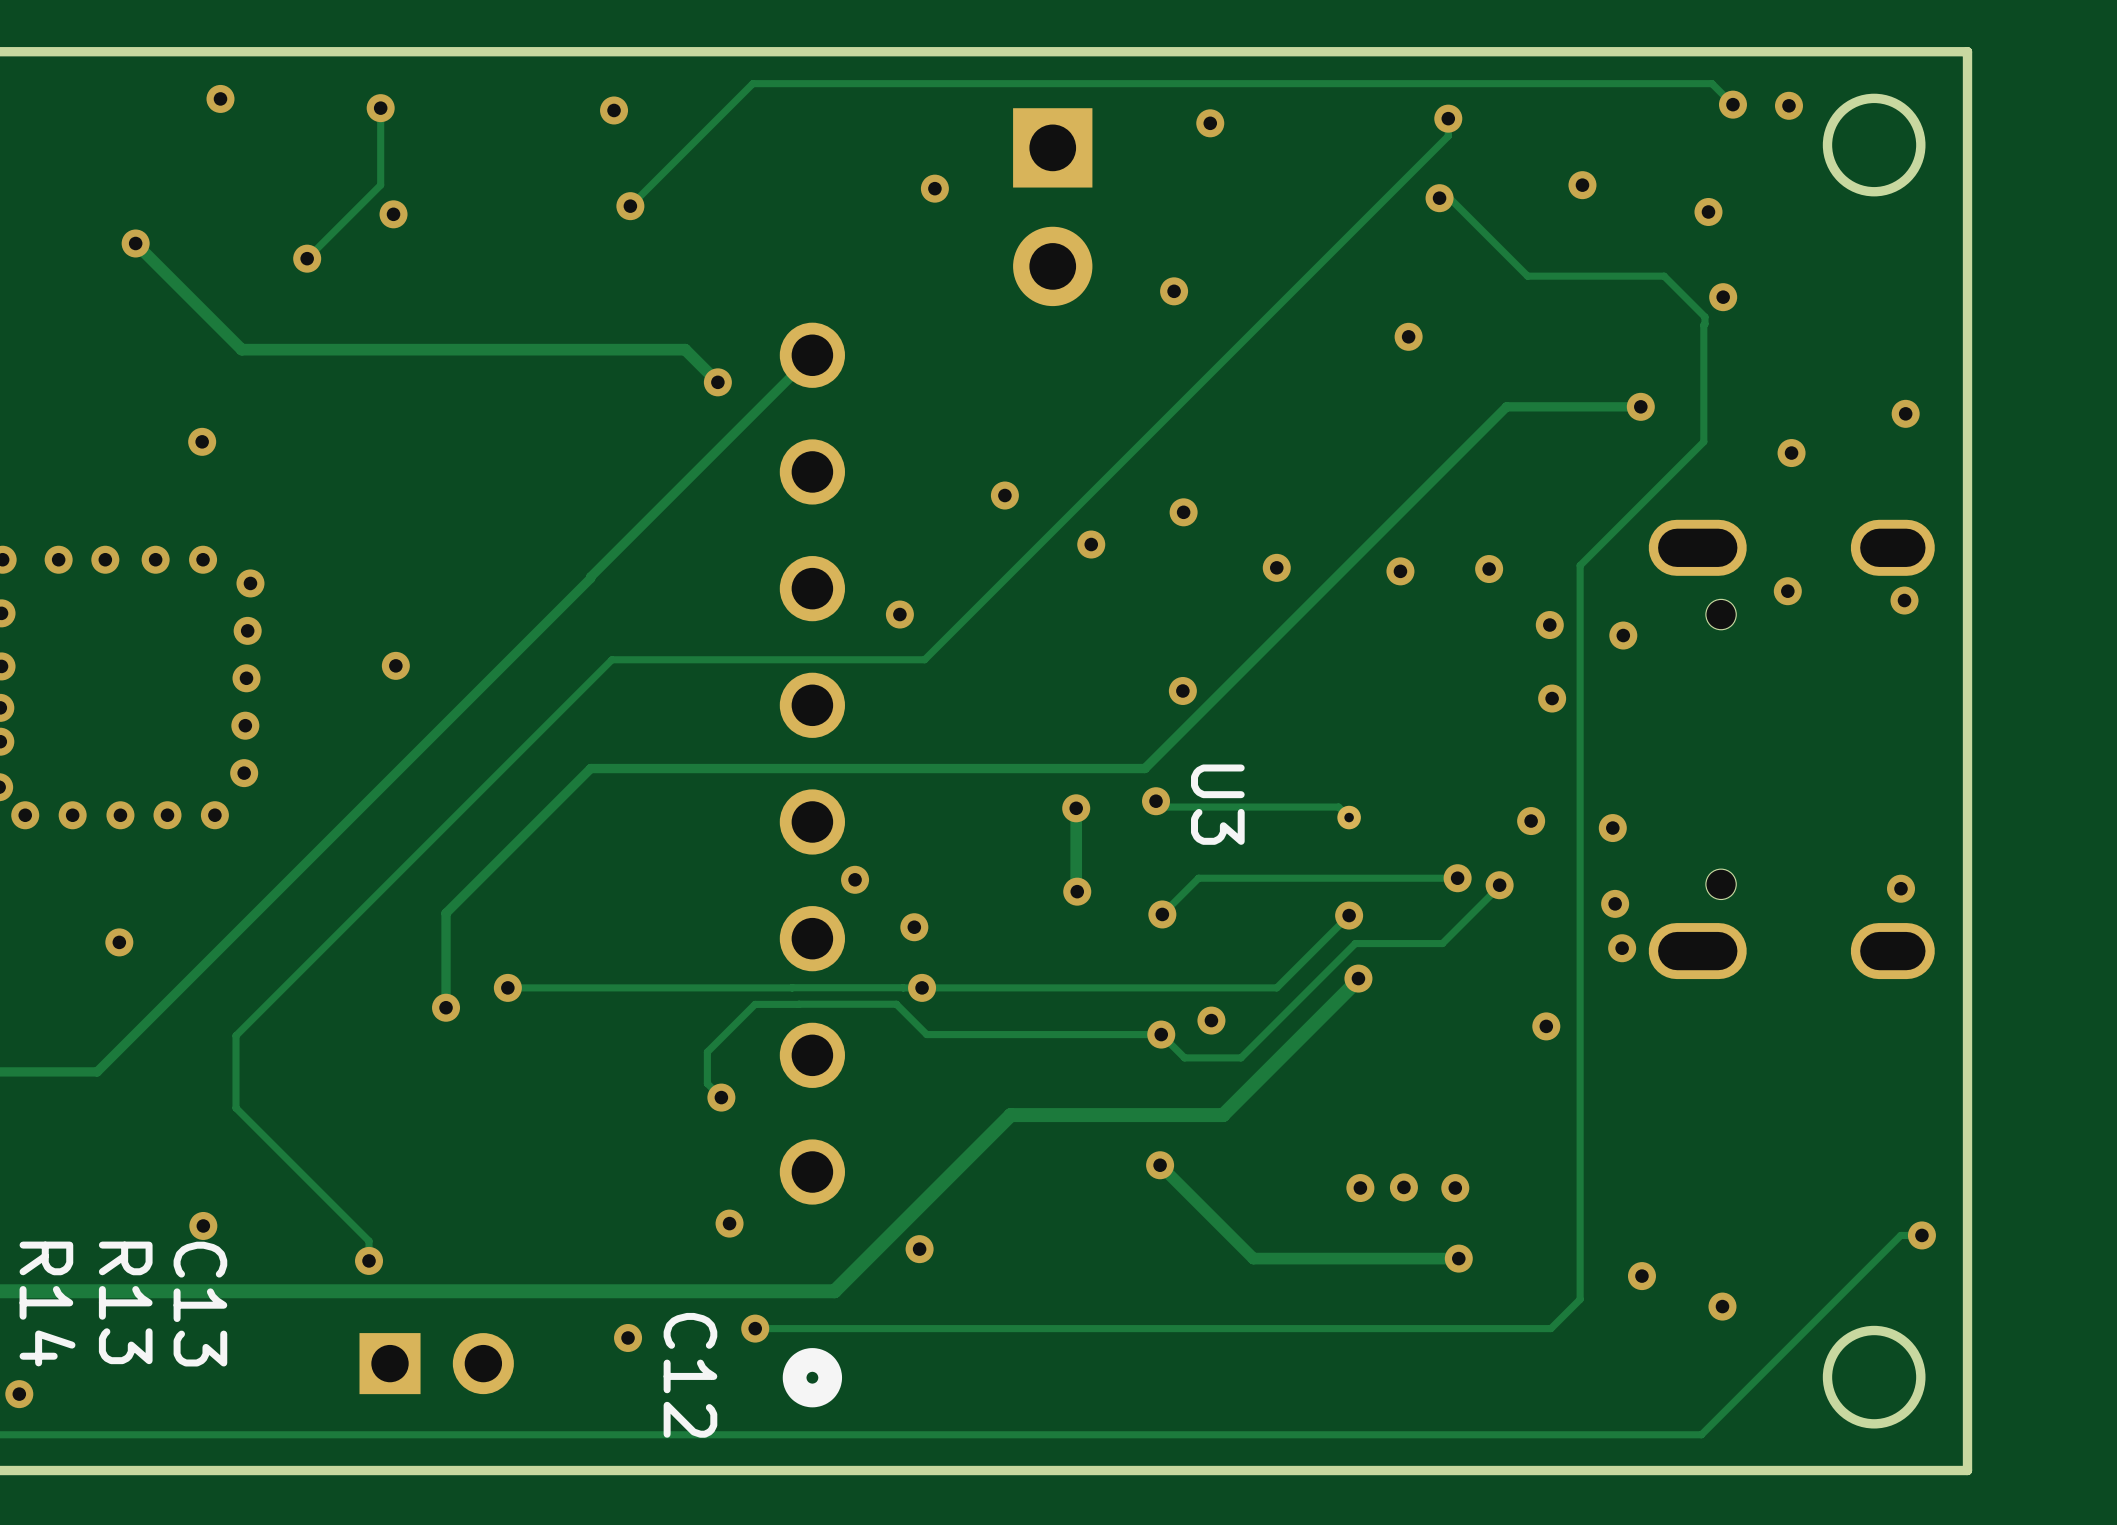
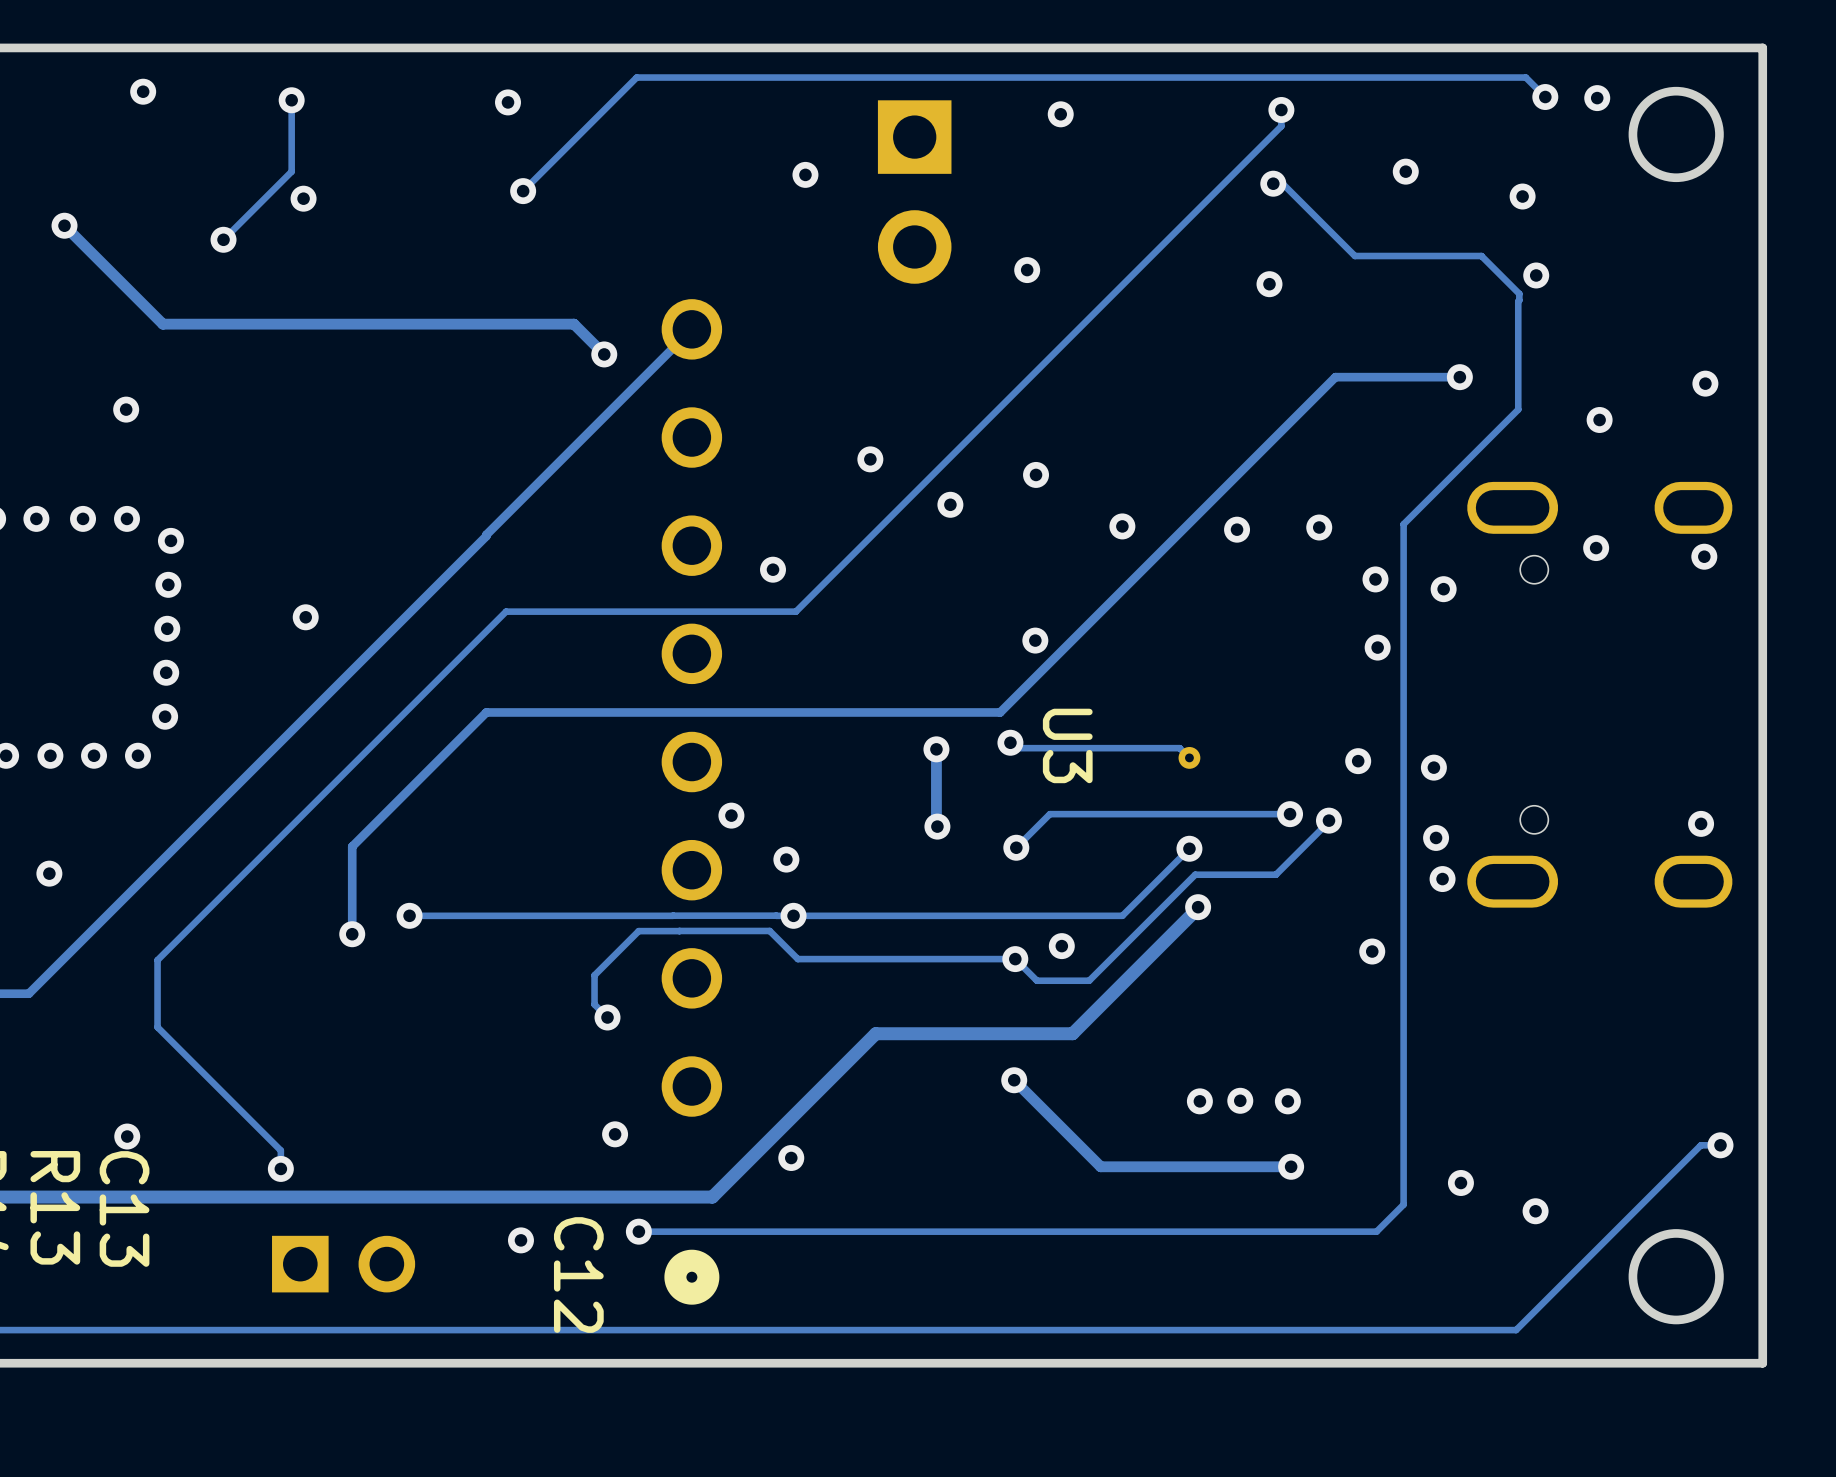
via position: (1408, 336) -> (1269, 284)

